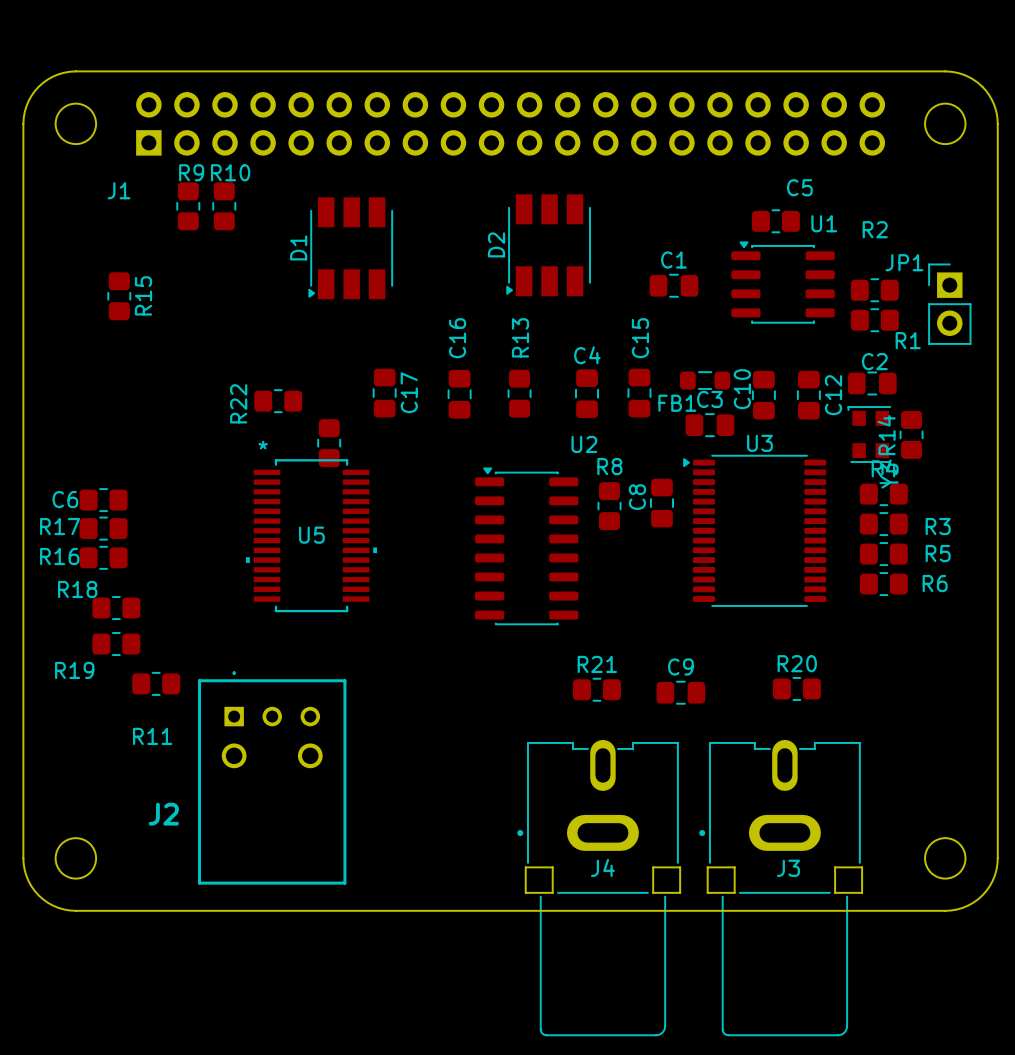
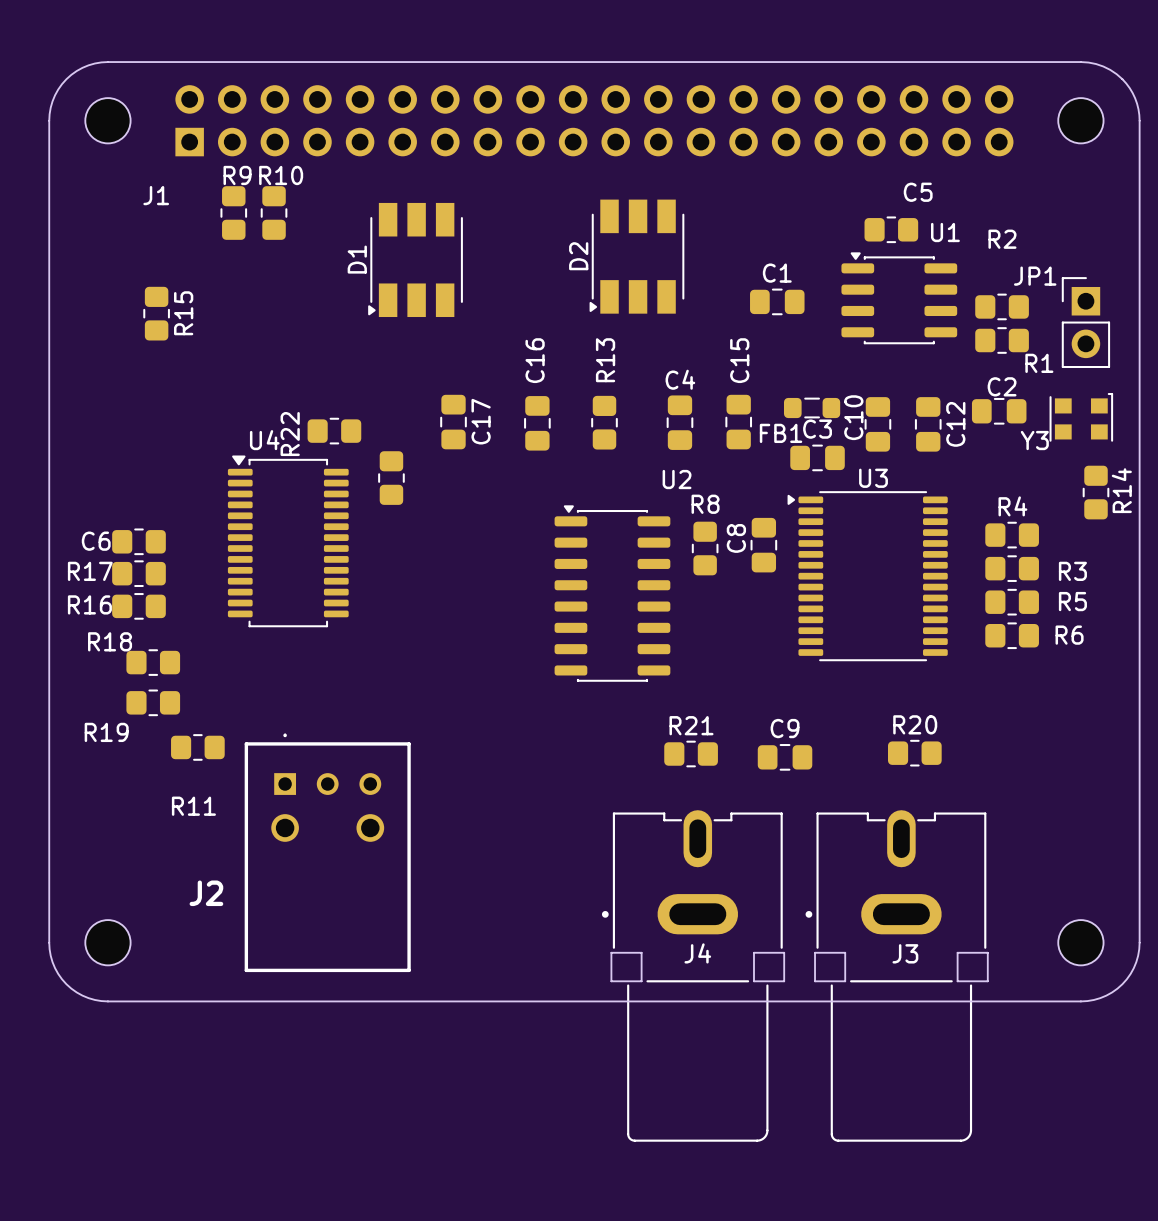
Y3 rotation: 0° (869, 434) -> 90° clockwise (1081, 417)
Y3 position: (869, 434) -> (1081, 417)
R14 position: (911, 434) -> (1096, 492)
R14 name position: R14 (886, 435) -> R14 (1121, 490)
U4: none -> (288, 541)
U5: (311, 535) -> none

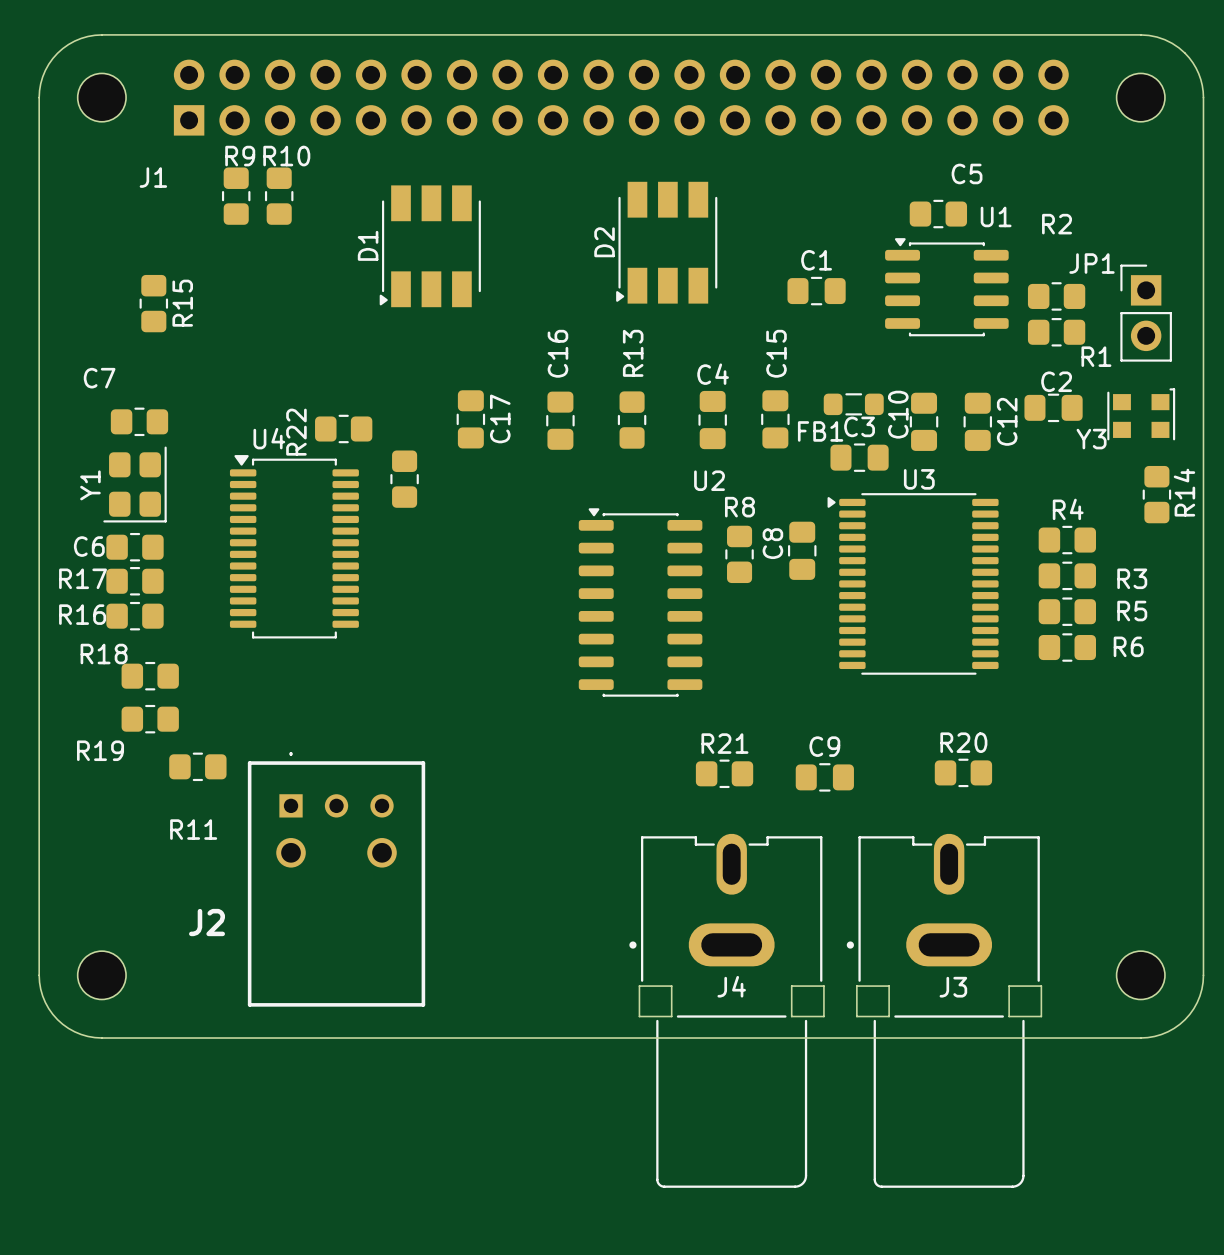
C7: none -> (139, 421)
Y1: none -> (135, 484)

